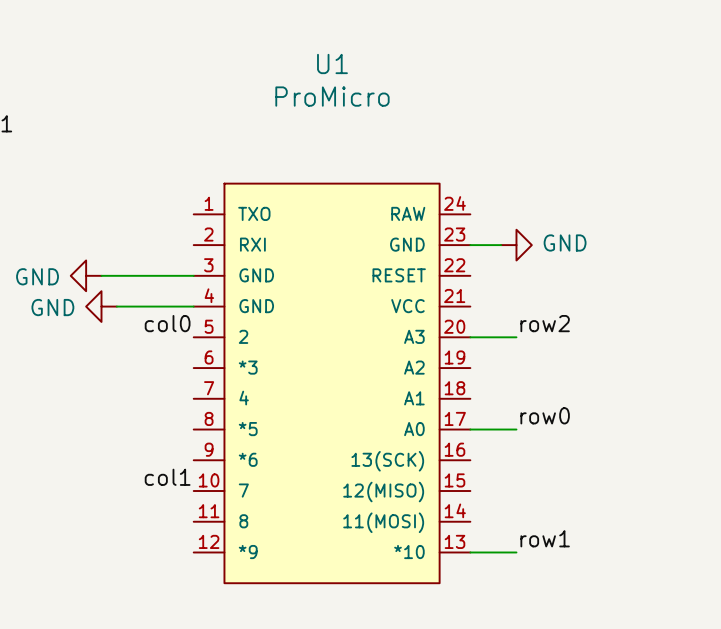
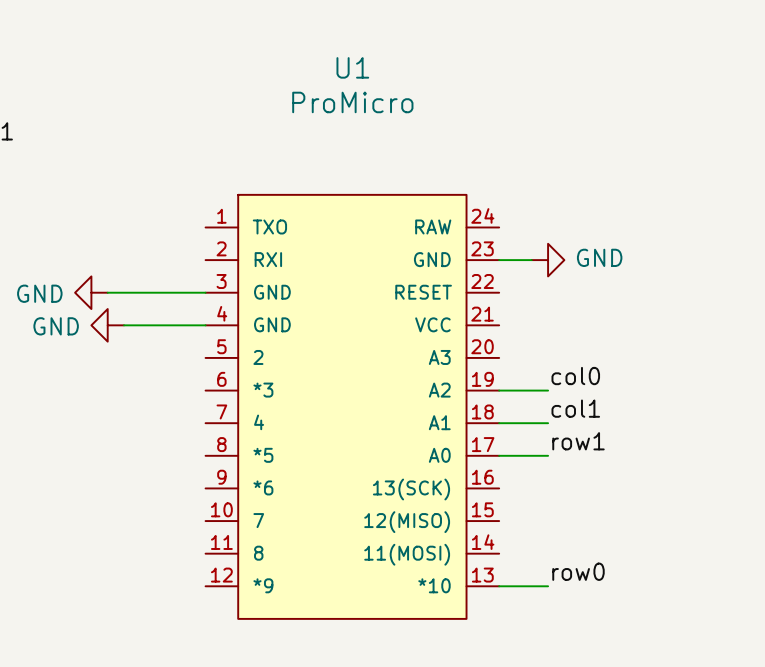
label: col0 (167, 323) -> none
label: row2 (545, 323) -> none
wire: (470, 337) (516, 337) -> (499, 390) (548, 390)
label: none -> col0 (575, 376)
label: none -> col1 (575, 408)
wire: none -> (499, 423) (548, 423)
label: row0 (545, 415) -> row1 (578, 441)
label: col1 (167, 477) -> none
label: row1 (545, 538) -> row0 (578, 571)

